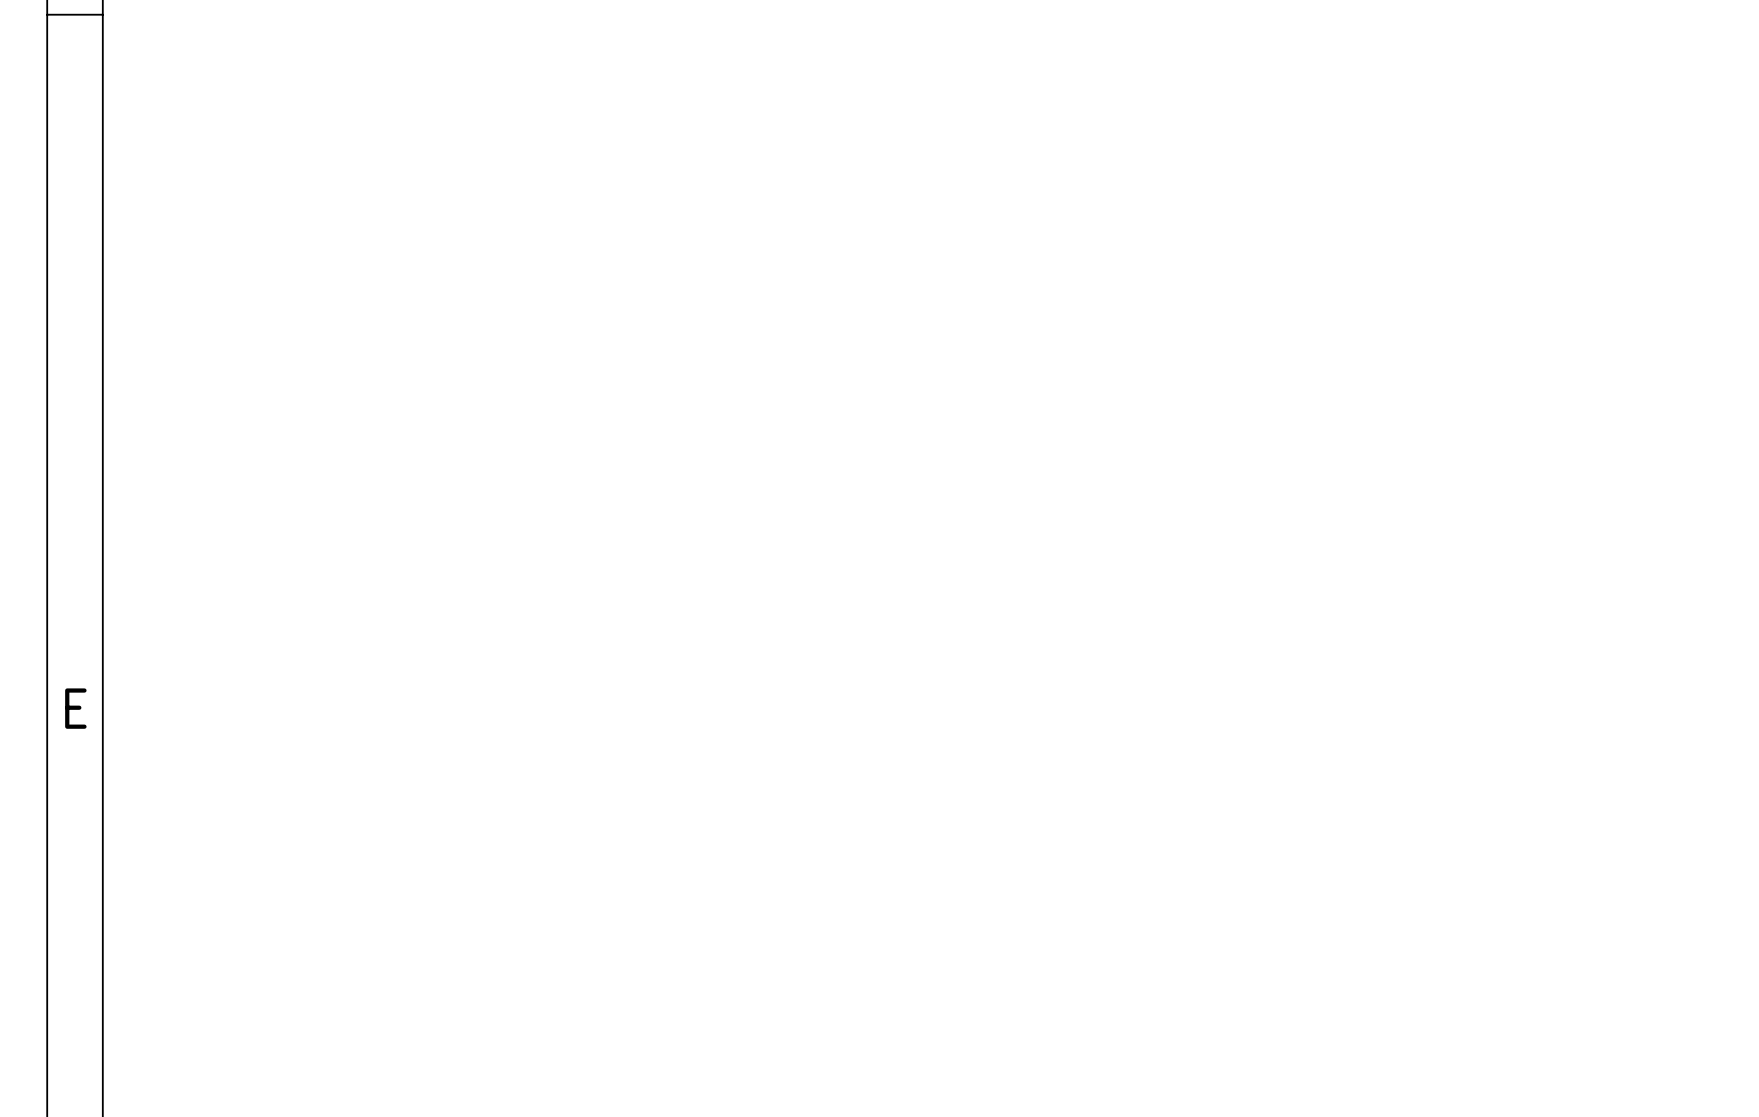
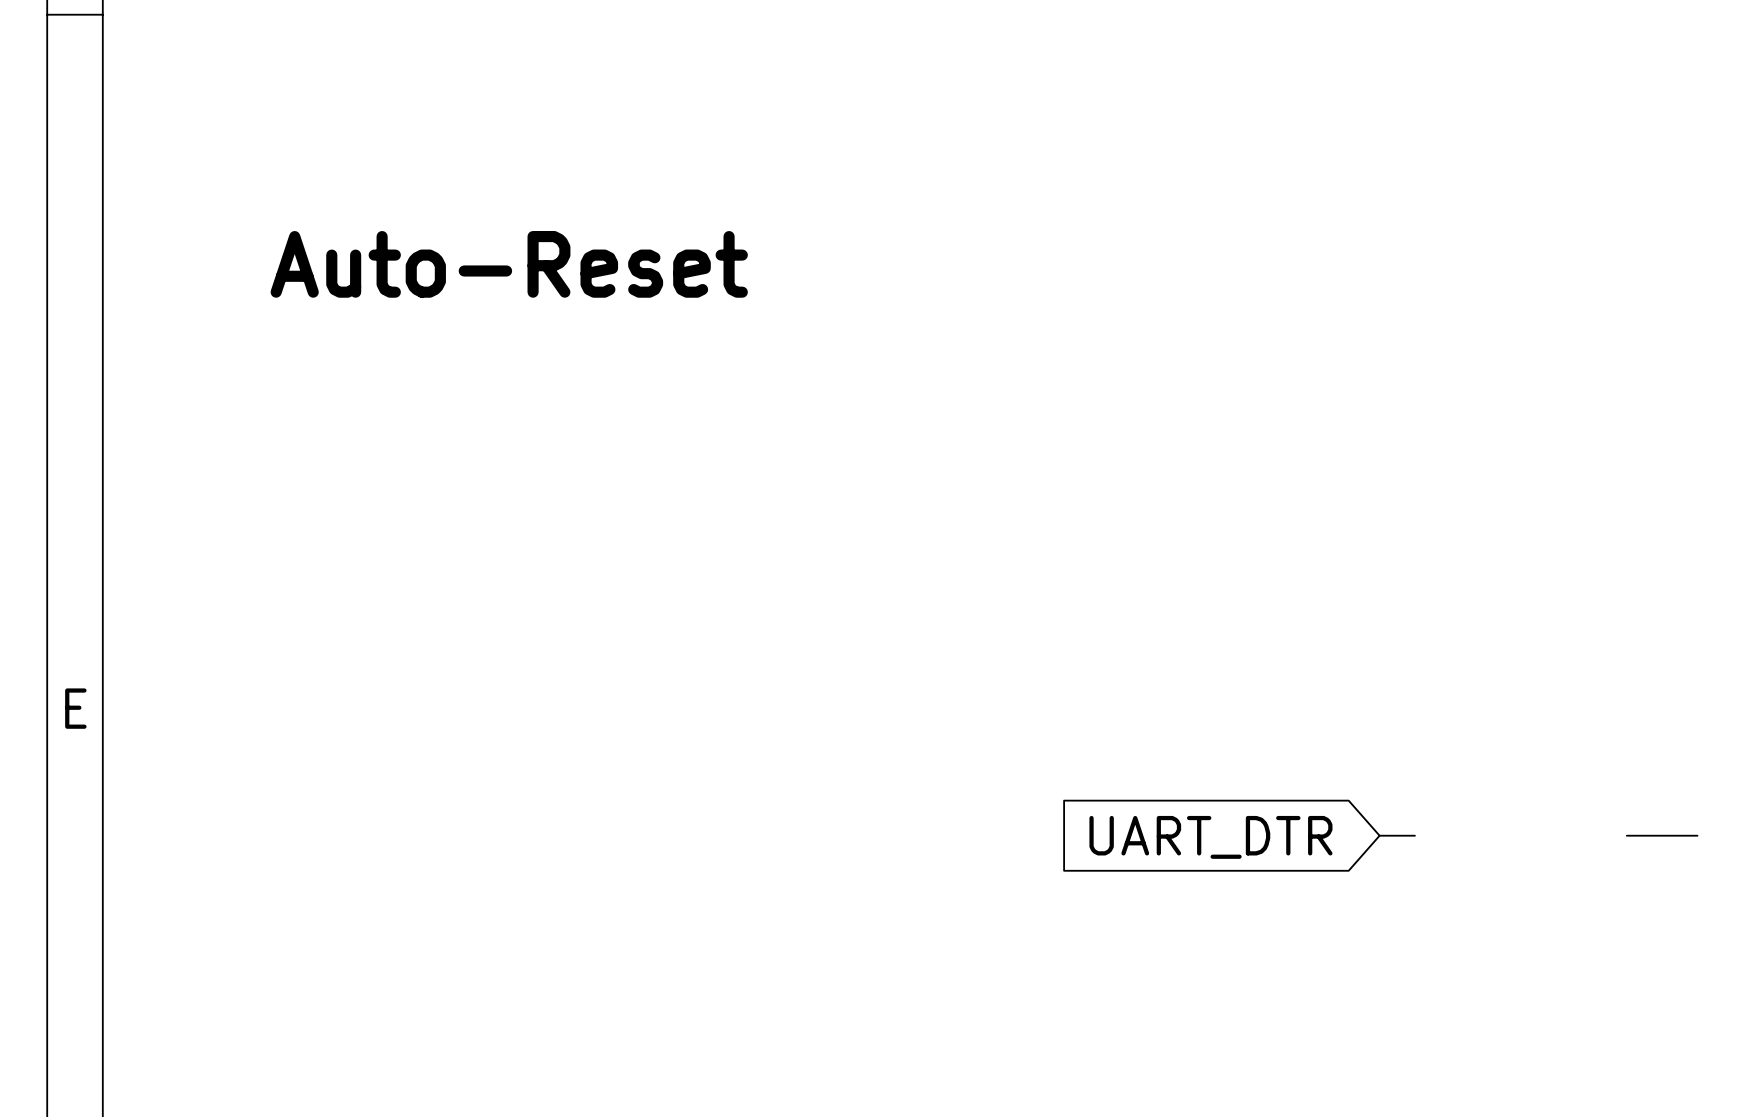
text: none -> Auto-Reset (509, 264)
wire: none -> (1379, 835) (1414, 835)
wire: none -> (1626, 835) (1697, 835)
global label: none -> UART_DTR (1210, 837)

